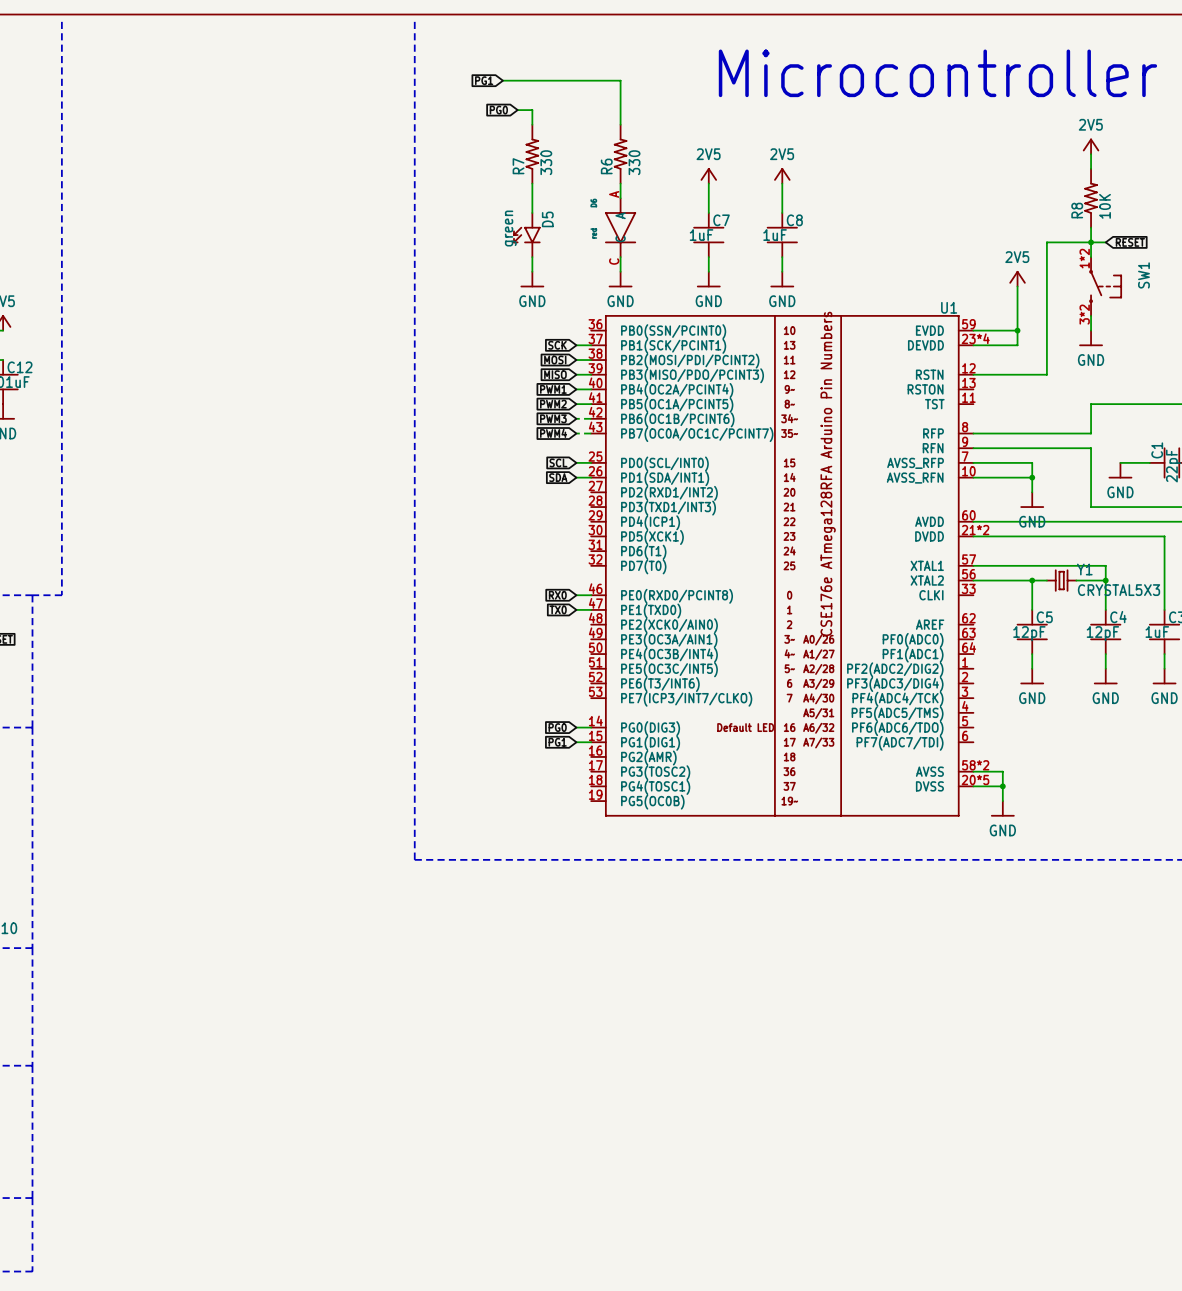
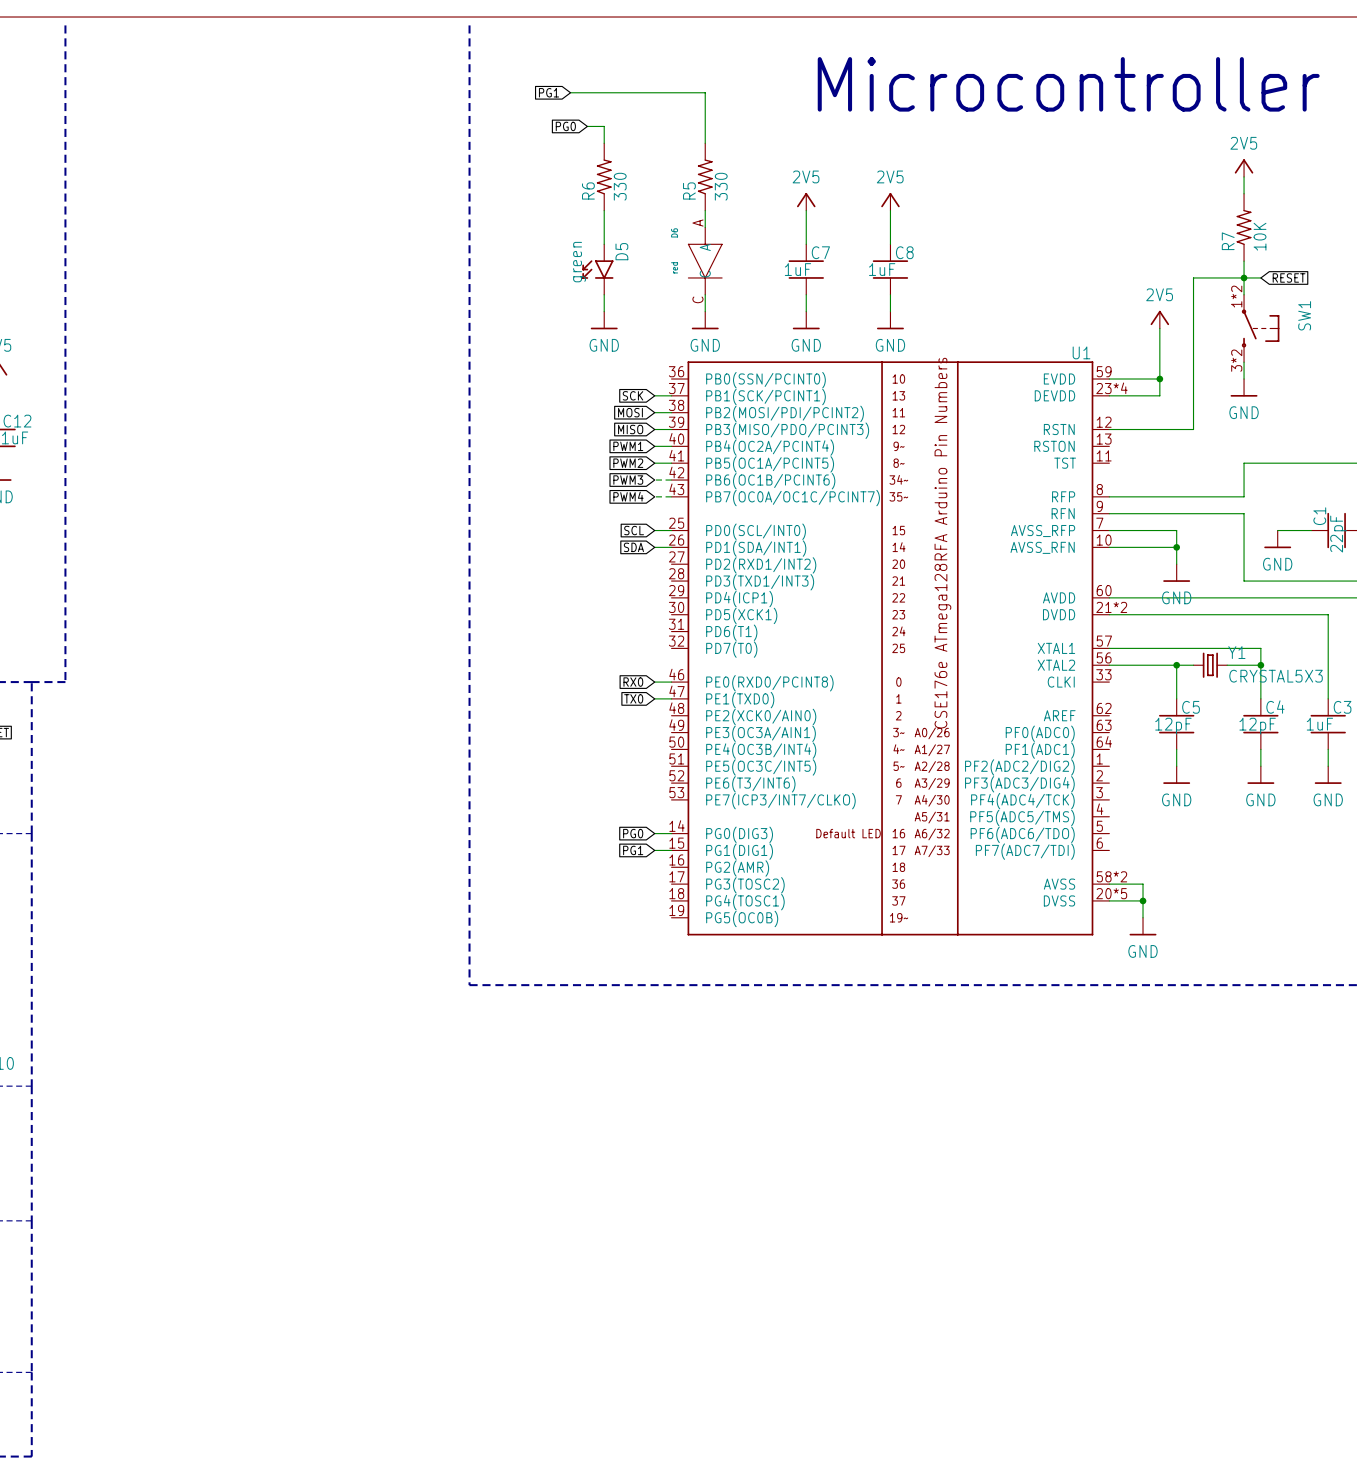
R7 name: R7 (518, 166) -> R6 (588, 190)
R6 name: R6 (606, 166) -> R5 (689, 190)
R8 name: R8 (1077, 210) -> R7 (1228, 241)

